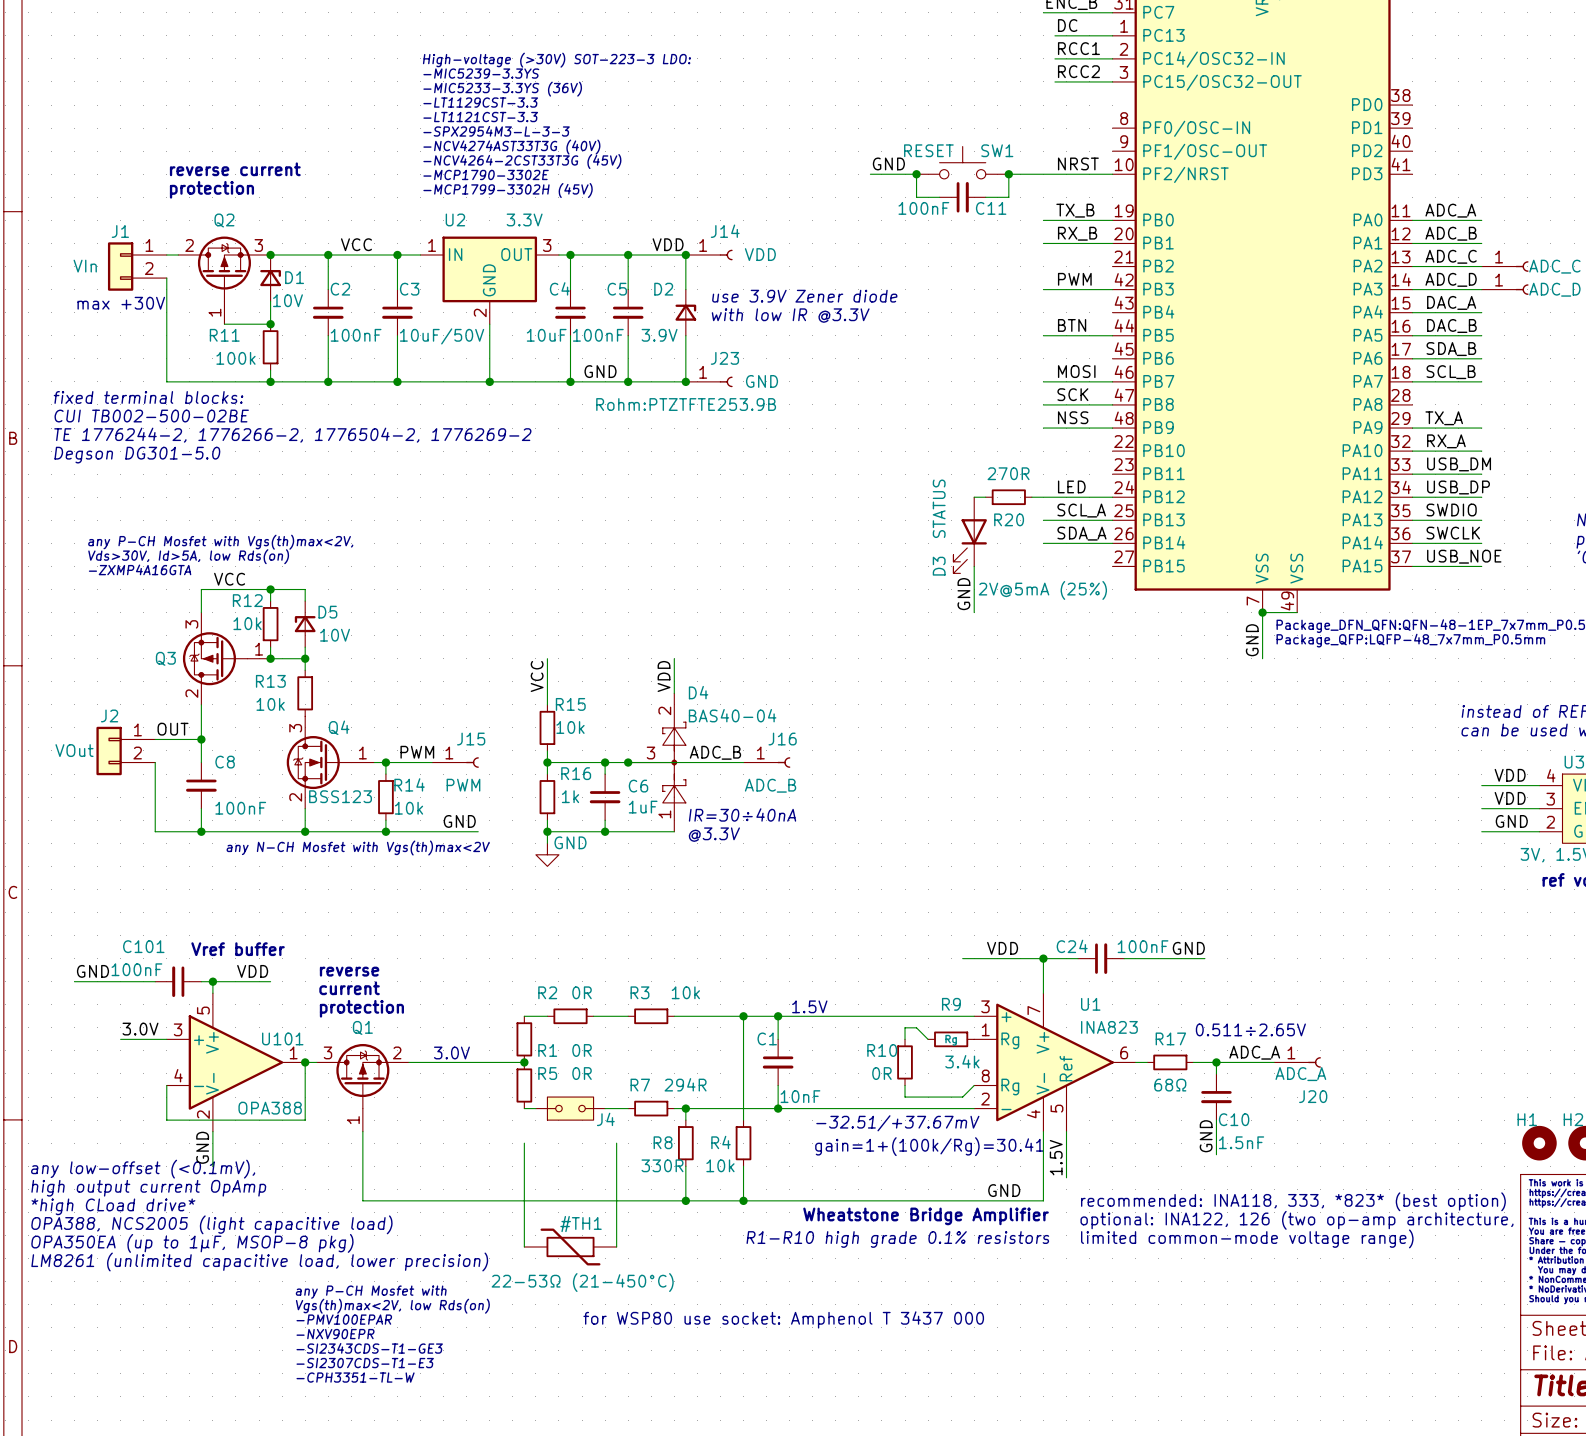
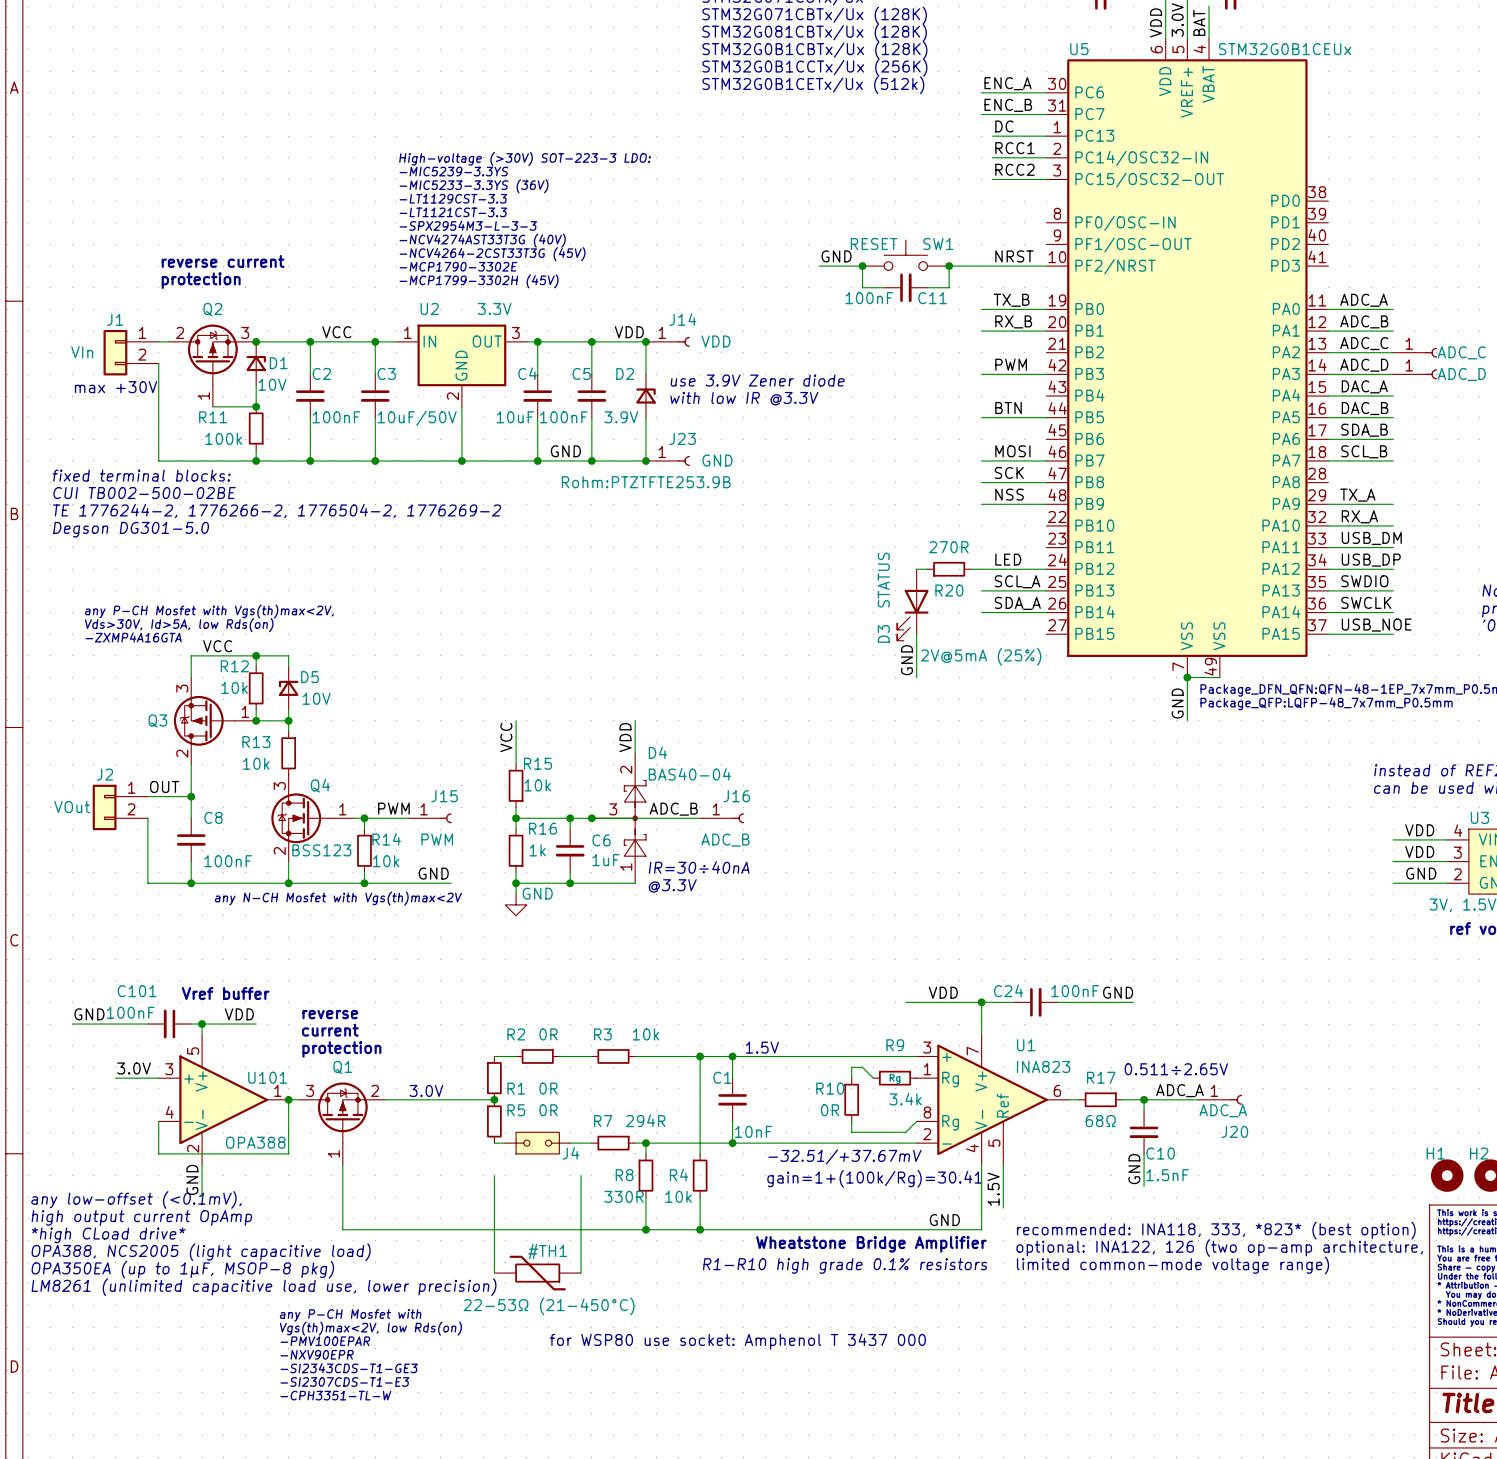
text: LM8261 (unlimited capacitive load, lower precision) (259, 1261) -> LM8261 (unlimited capacitive load use, lower precision) (264, 1287)

